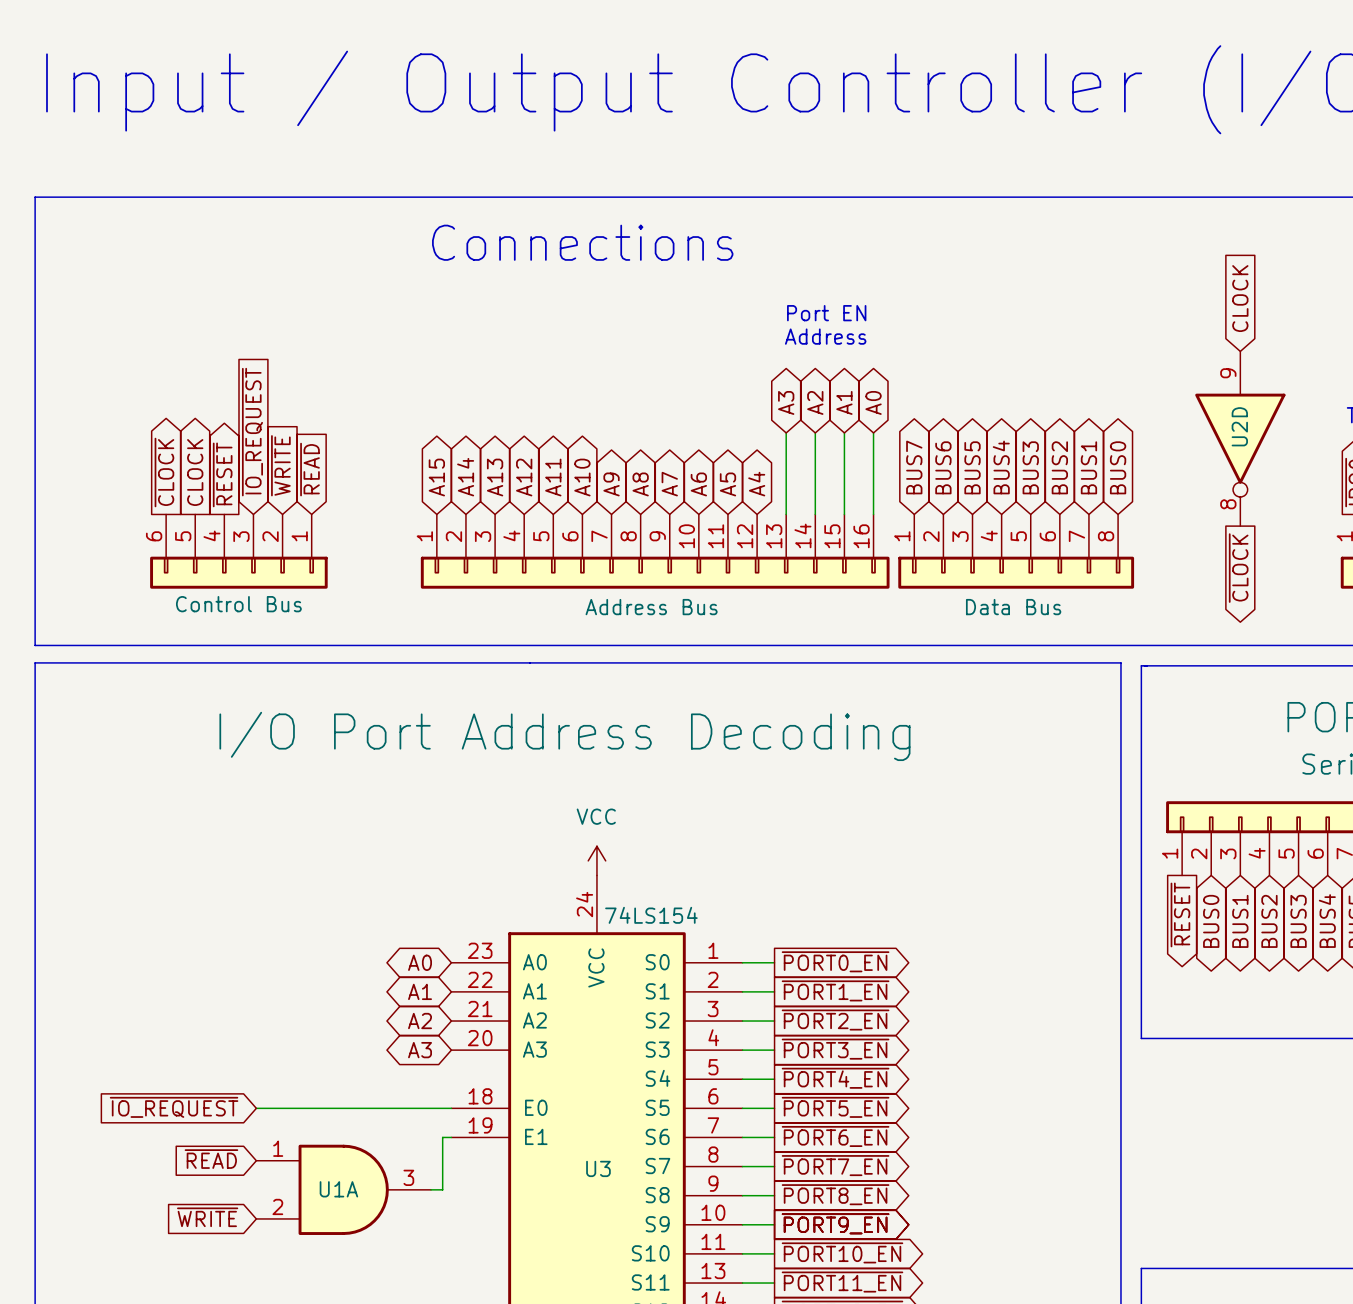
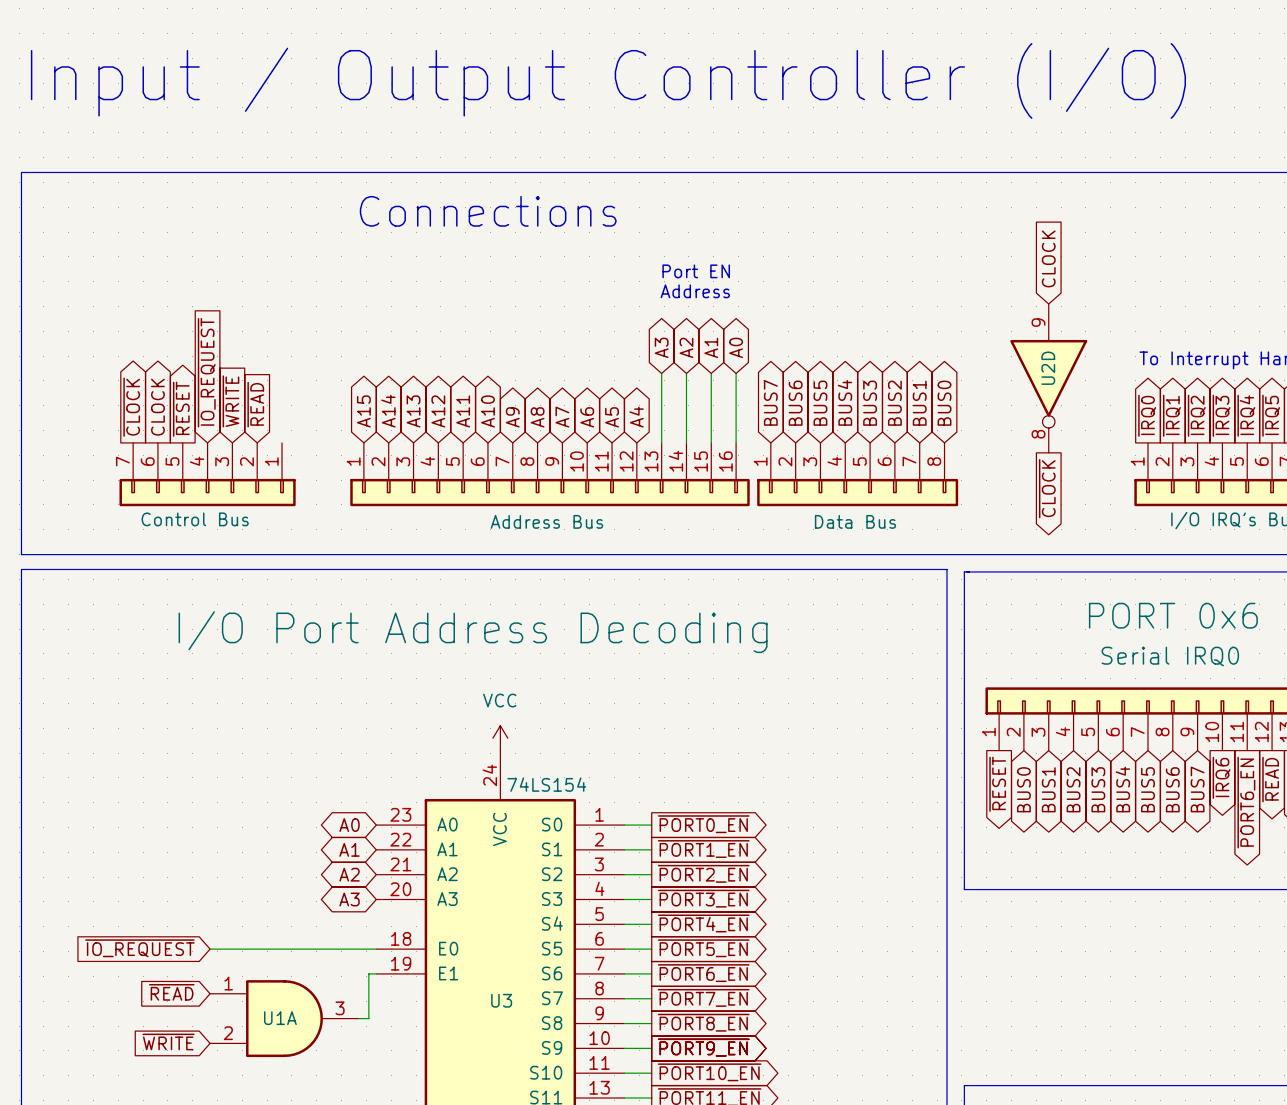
part: (238, 551) -> none
part: none -> (207, 474)

